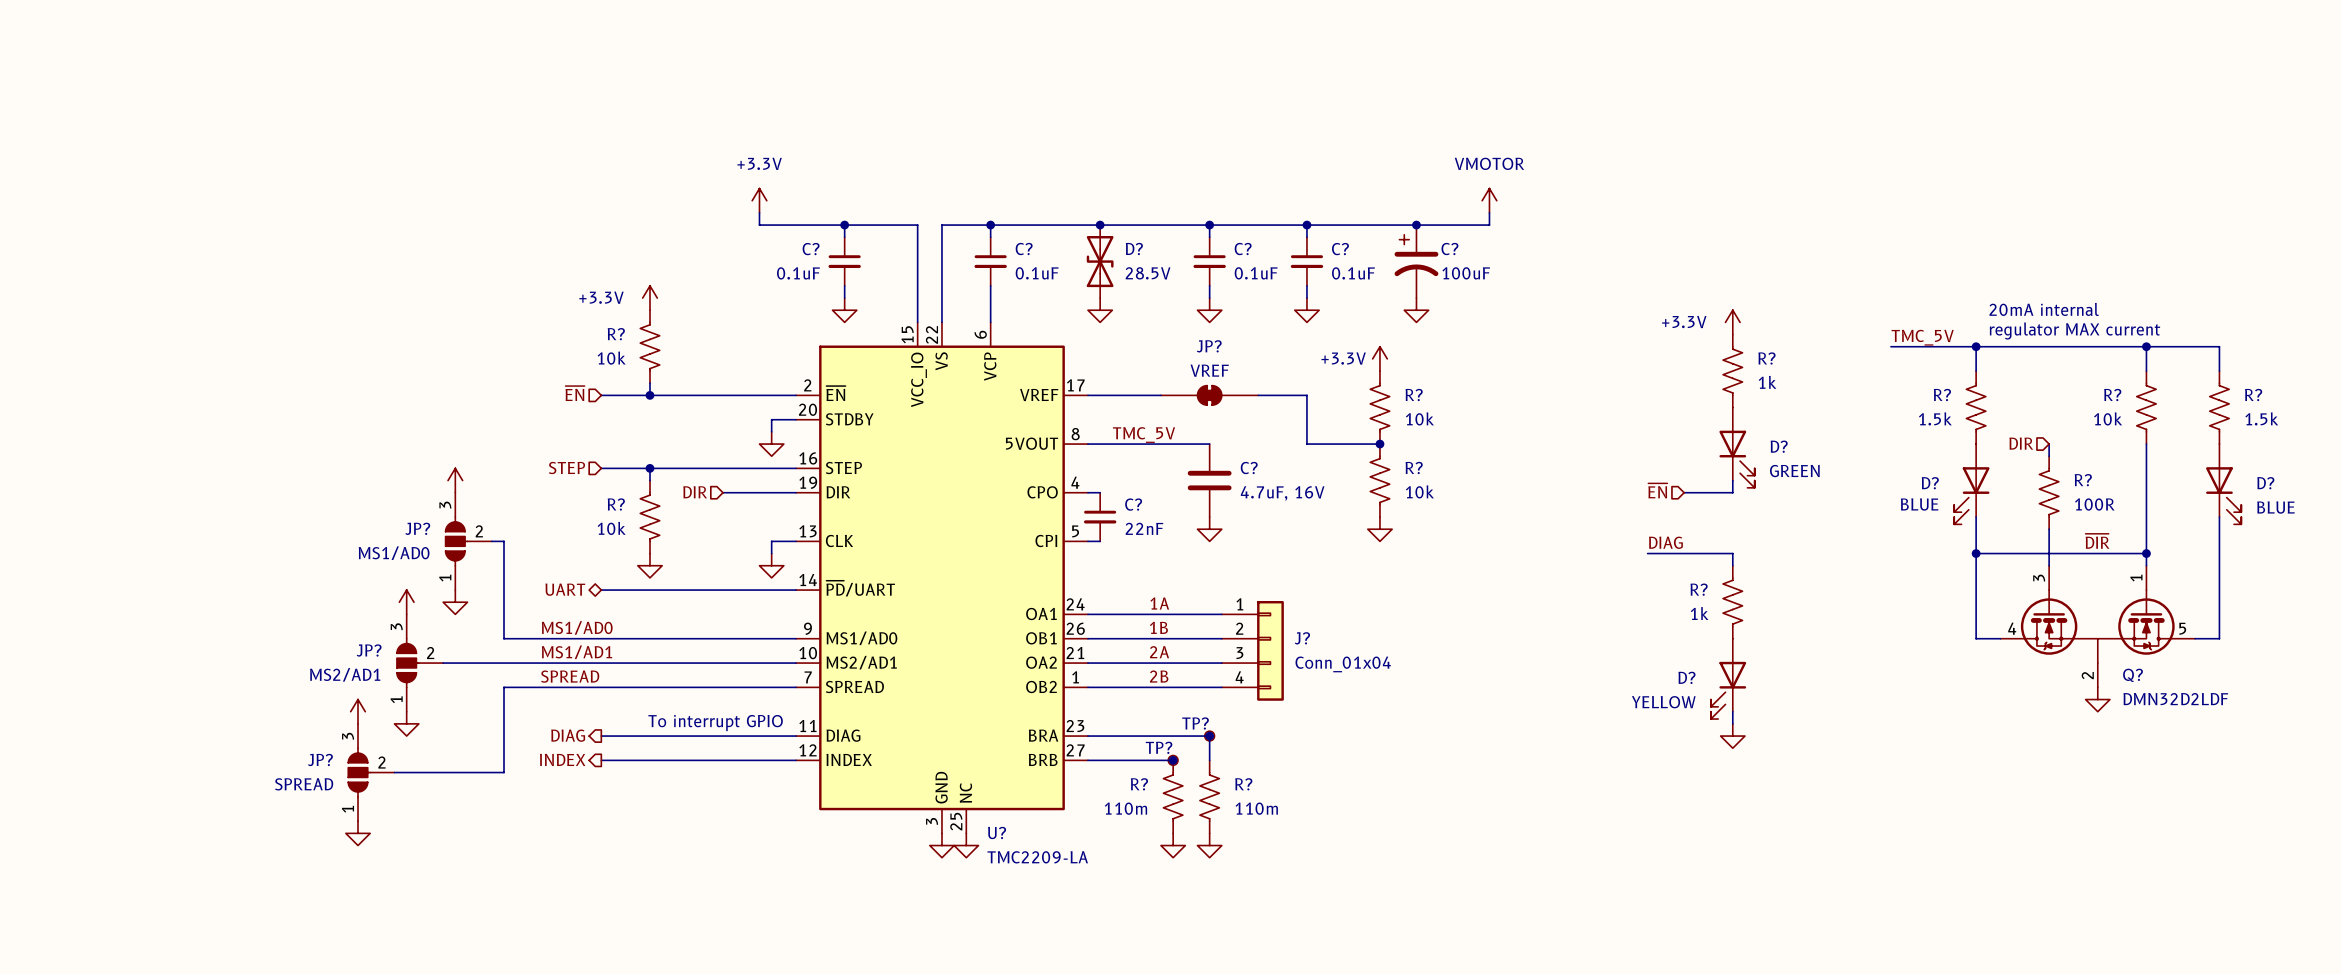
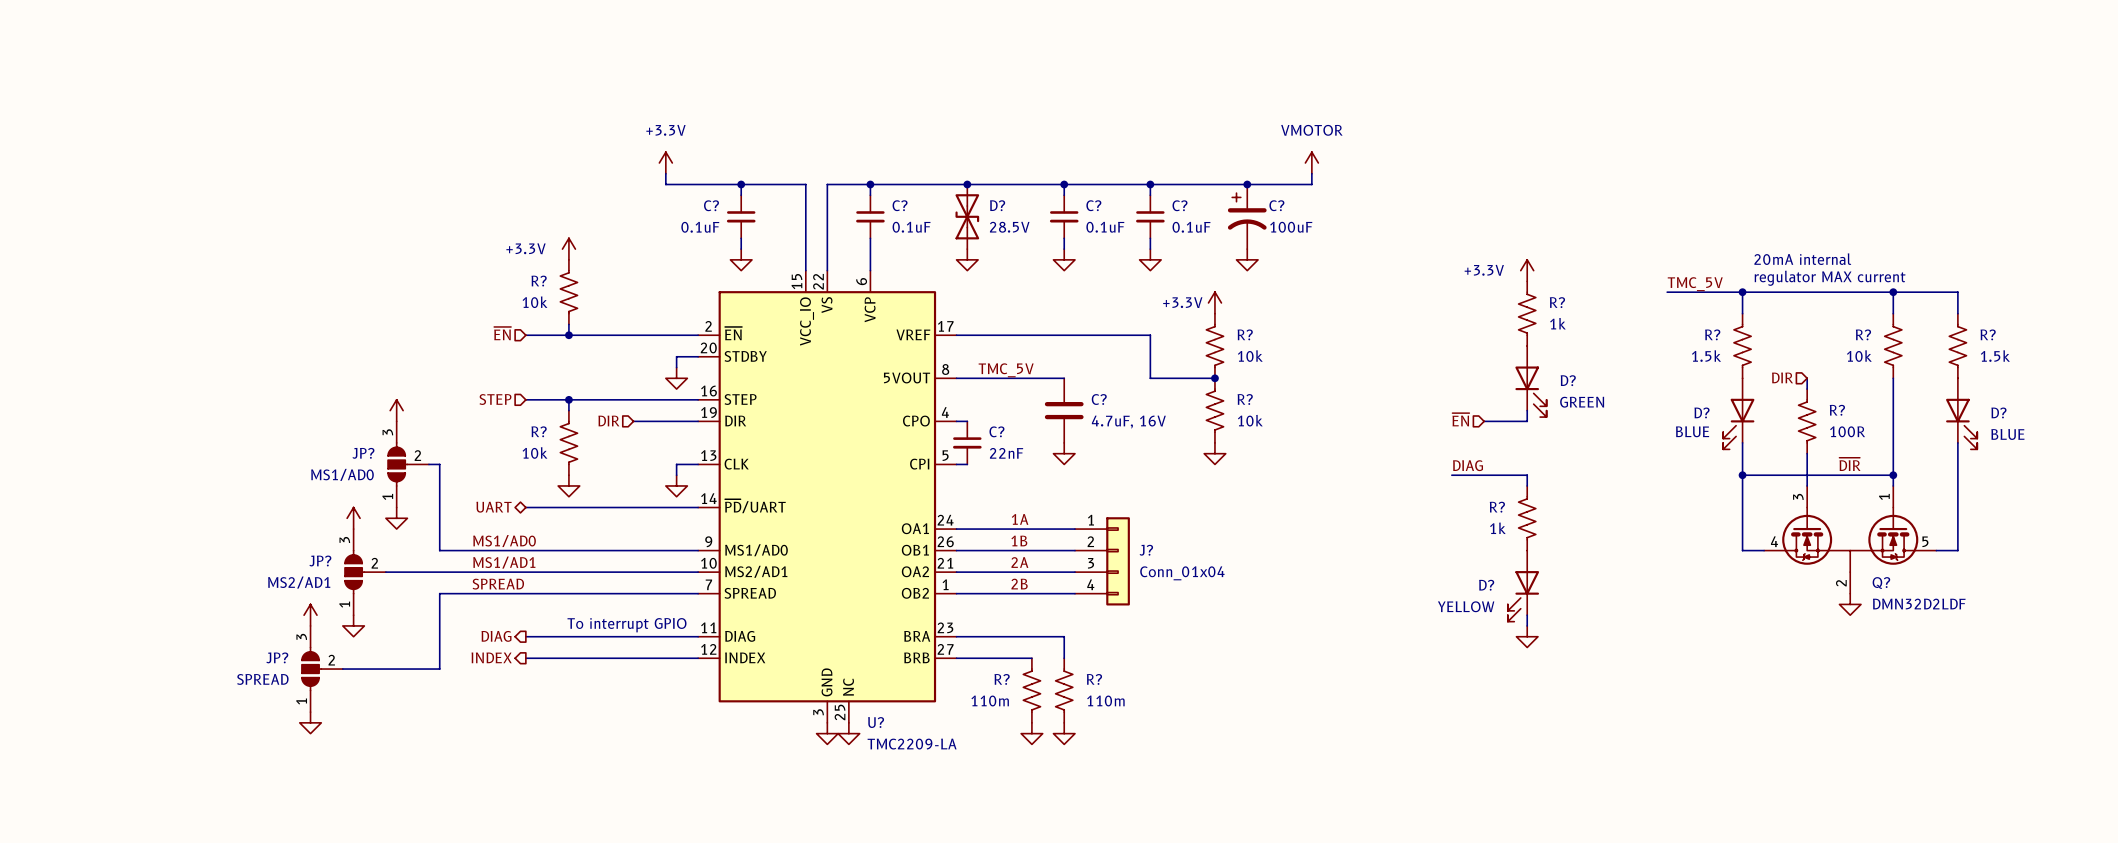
JP?: VREF (1209, 395) -> none
junction: (1209, 736) -> none
TP?: (1209, 736) -> none
junction: (1173, 760) -> none
TP?: (1173, 760) -> none

